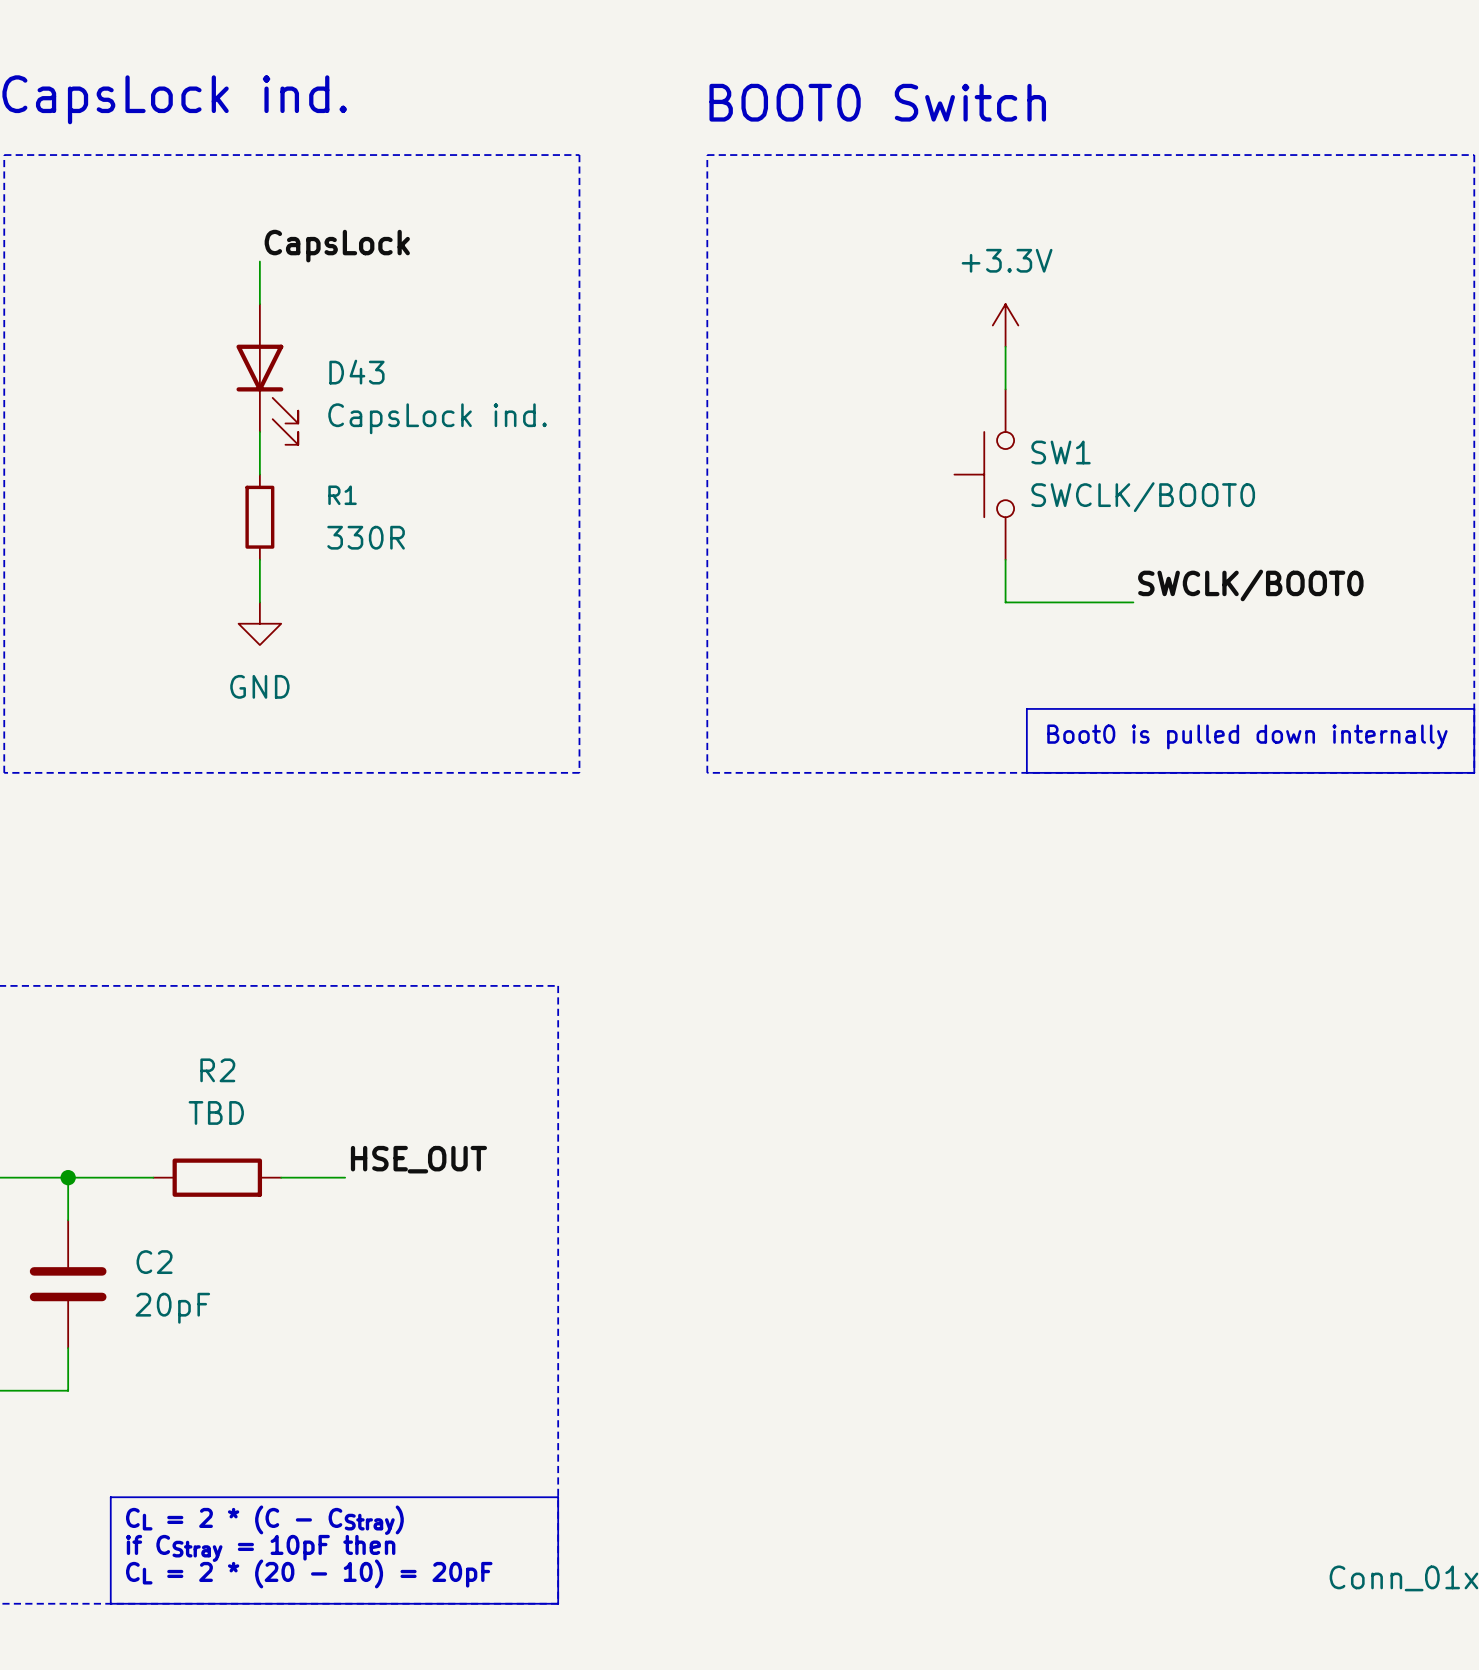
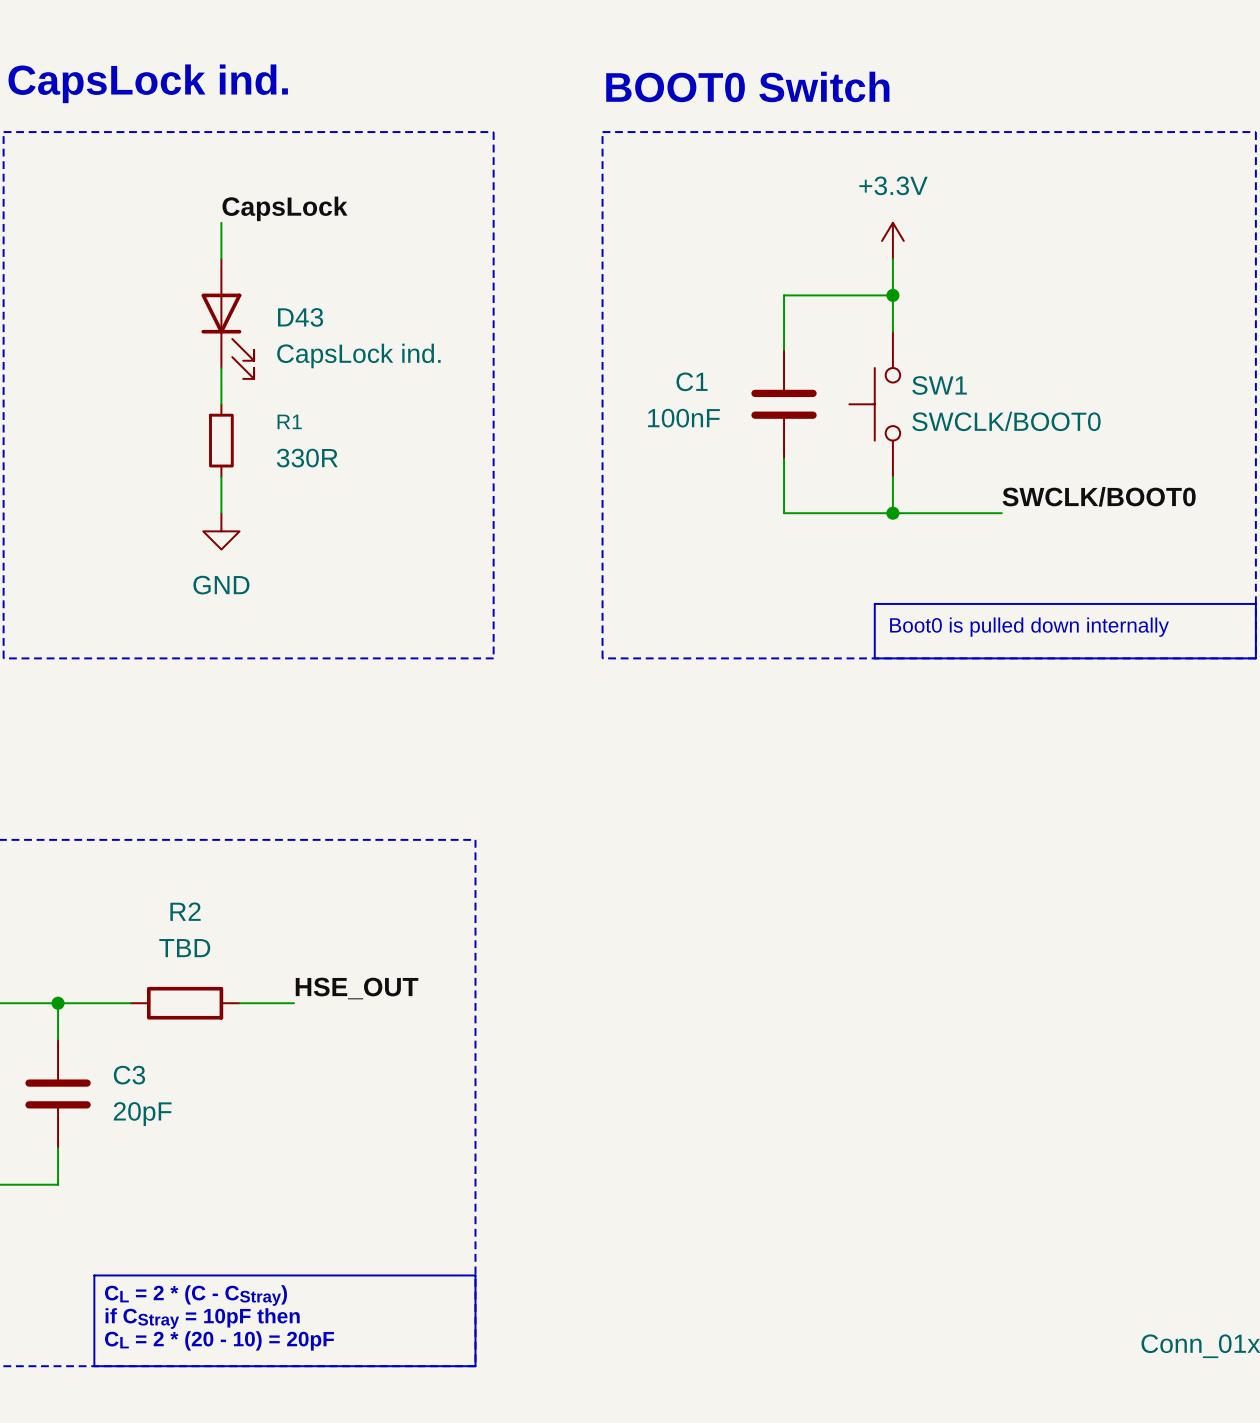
wire: none -> (892, 259) (892, 331)
power symbol position: +3.3V (1005, 325) -> +3.3V (892, 240)
wire: (1005, 346) (1005, 389) -> (892, 476) (892, 513)
wire: none -> (892, 295) (784, 295) (784, 349)
junction: none -> (892, 295)
C1: none -> 100nF (784, 404)
SW1 position: (984, 474) -> (874, 404)
wire: (1005, 559) (1005, 602) -> (784, 458) (784, 513) (856, 513)
label position: SWCLK/BOOT0 (1250, 585) -> SWCLK/BOOT0 (1099, 496)
junction: none -> (892, 513)
wire: none -> (965, 513) (1001, 513)
C2 name: C2 (154, 1262) -> C3 (129, 1075)

